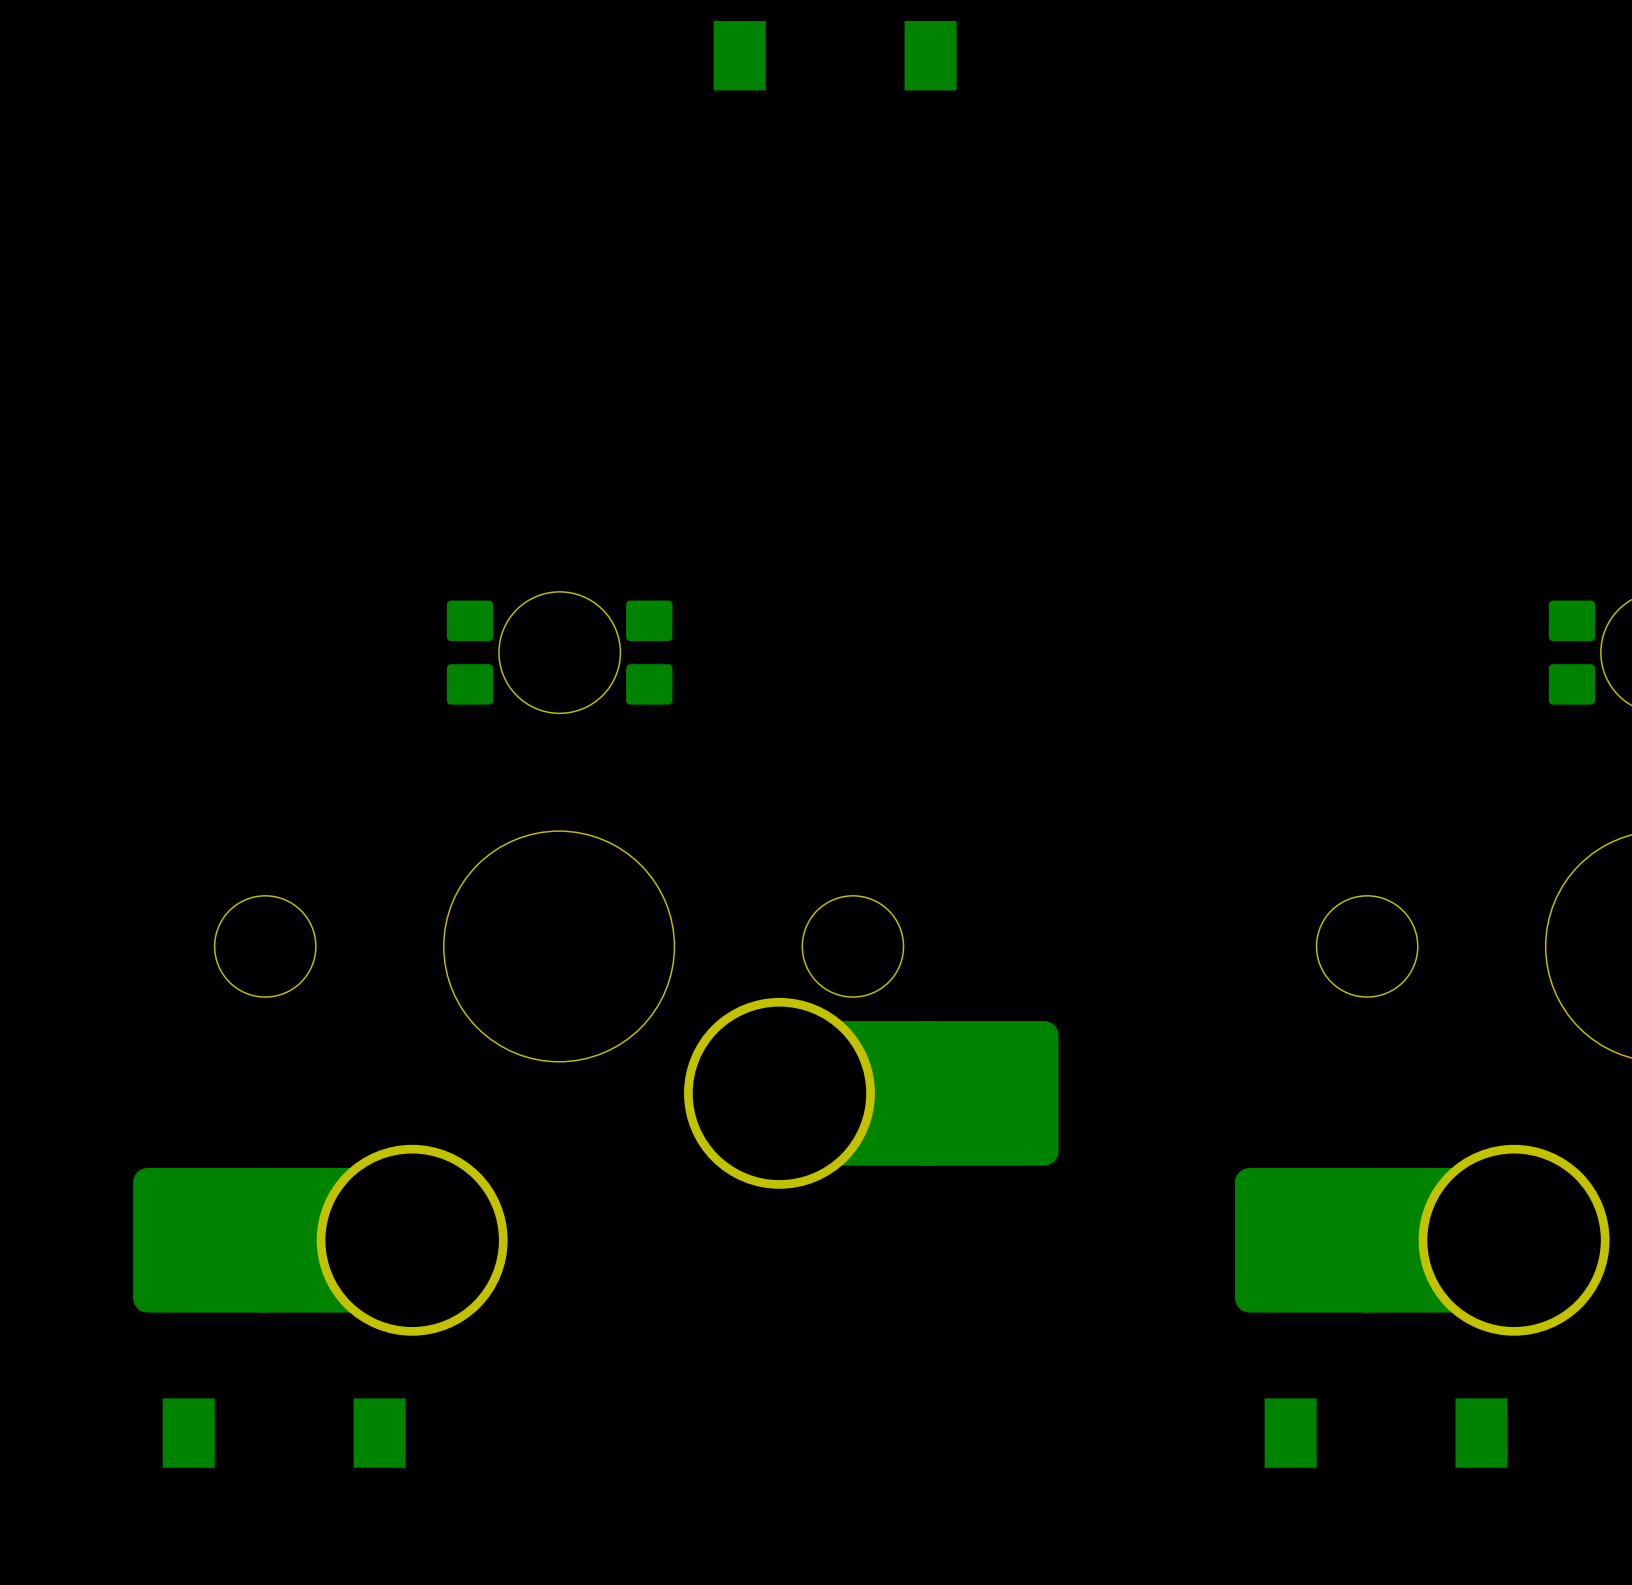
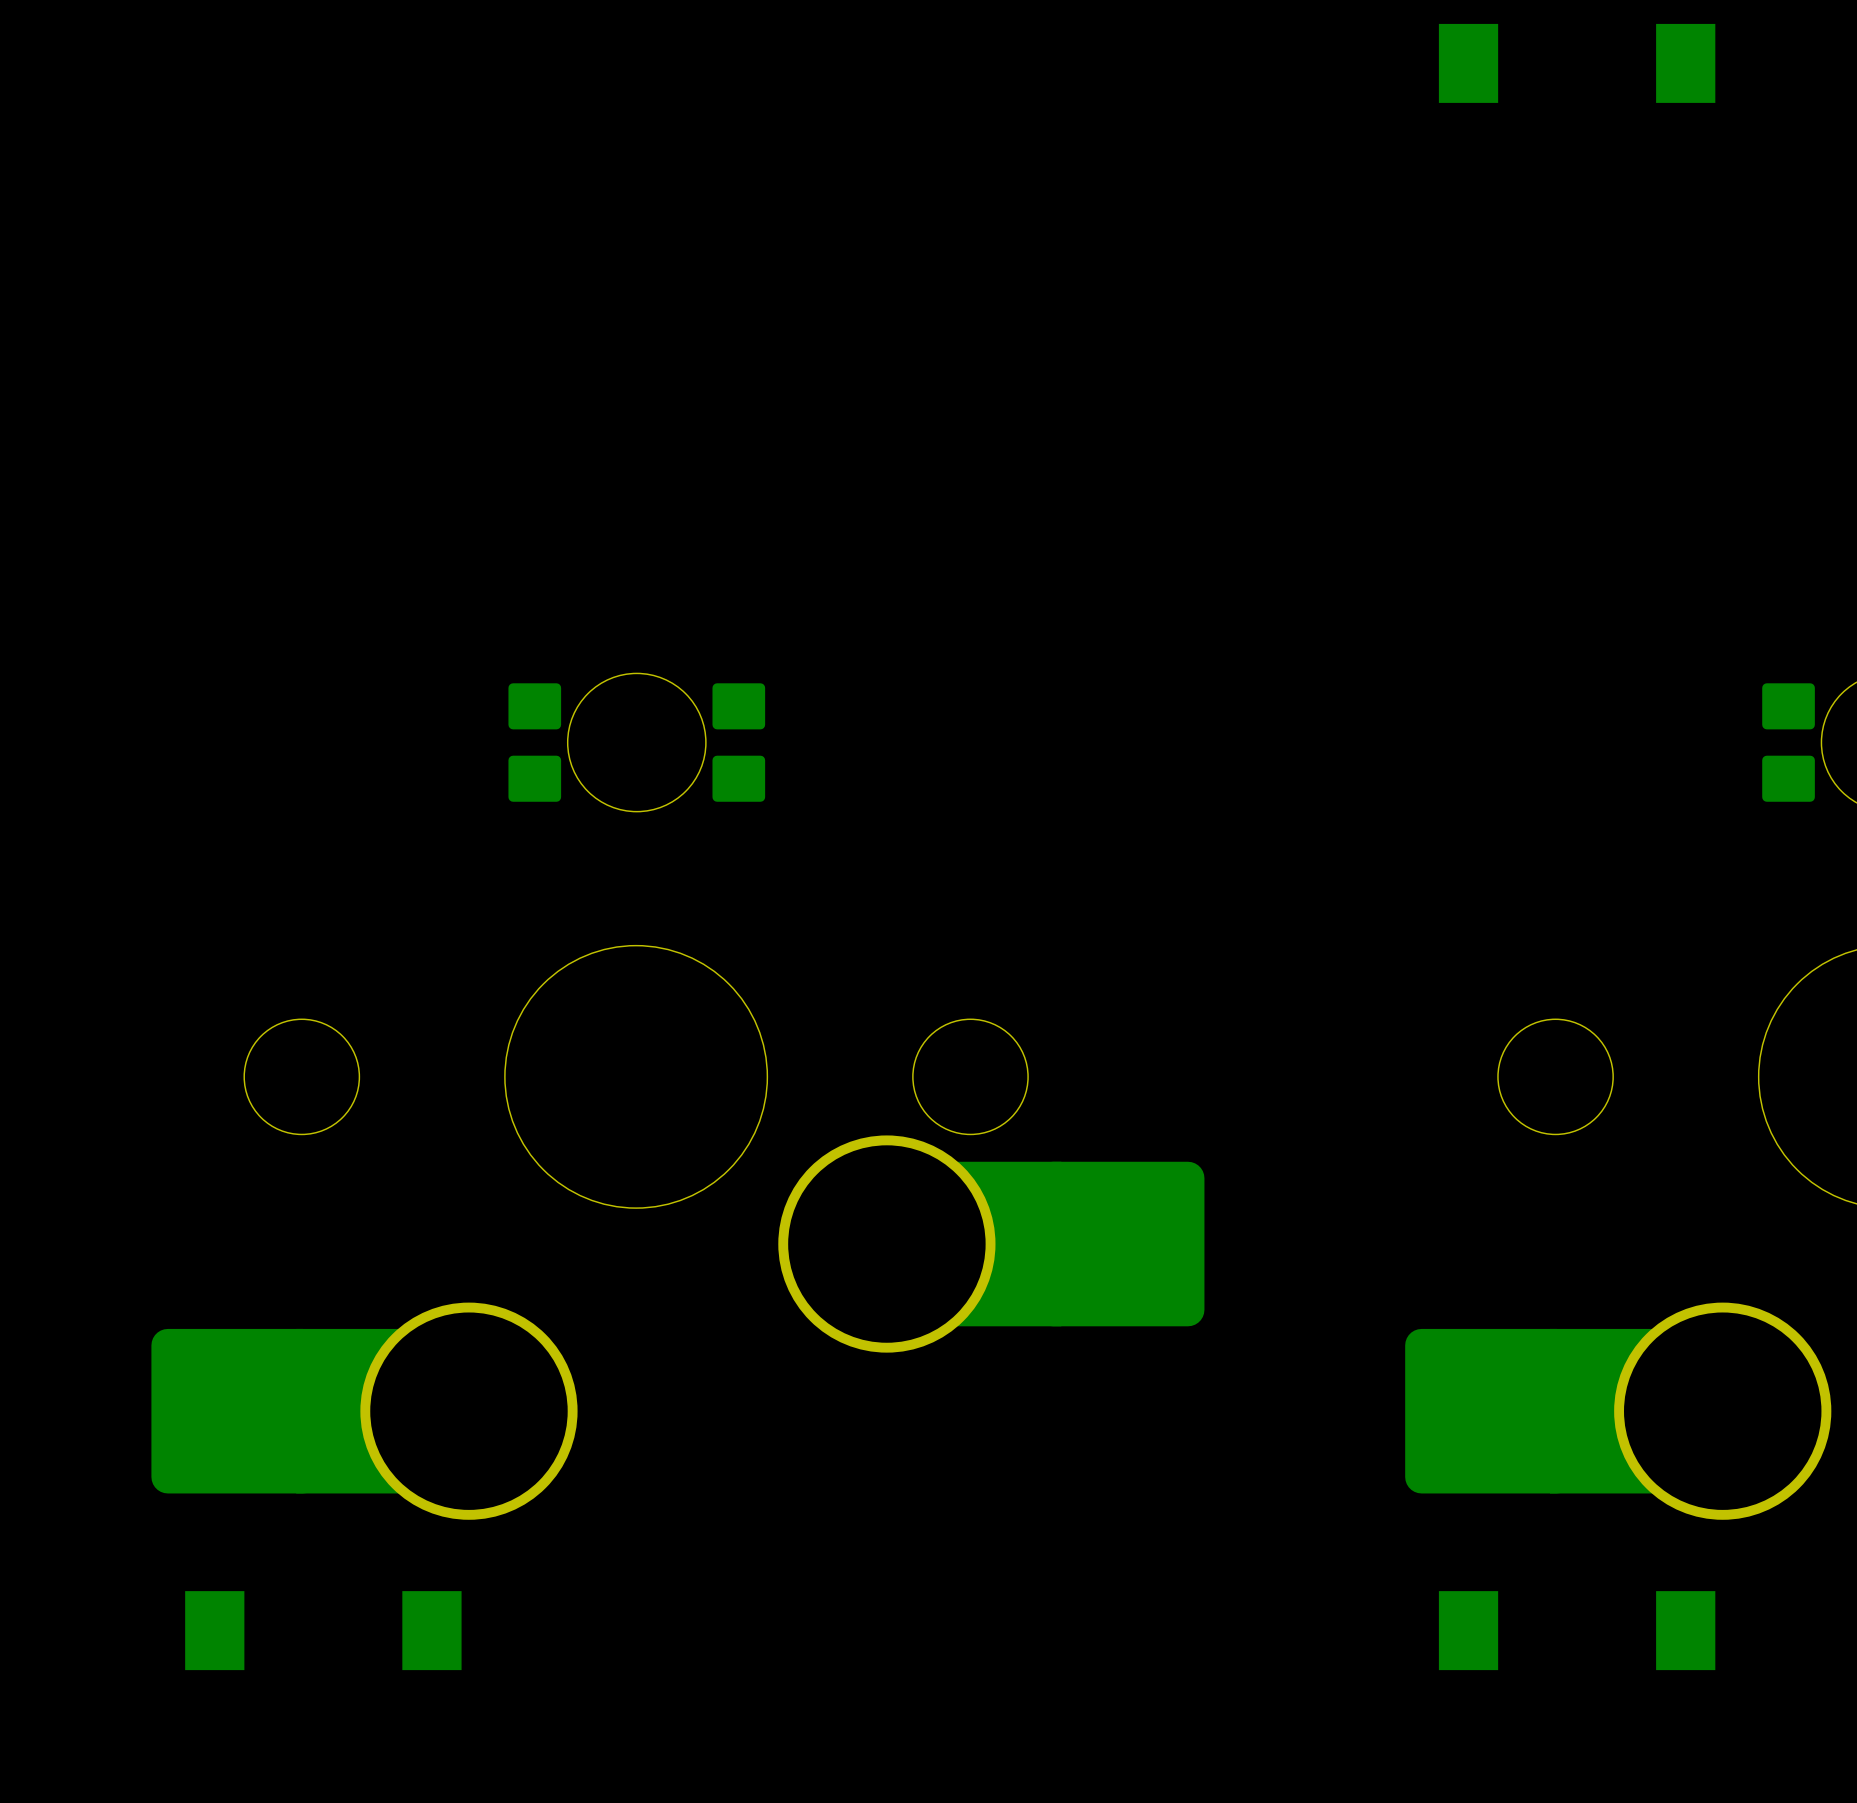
part position: (835, 55) -> (1577, 63)

